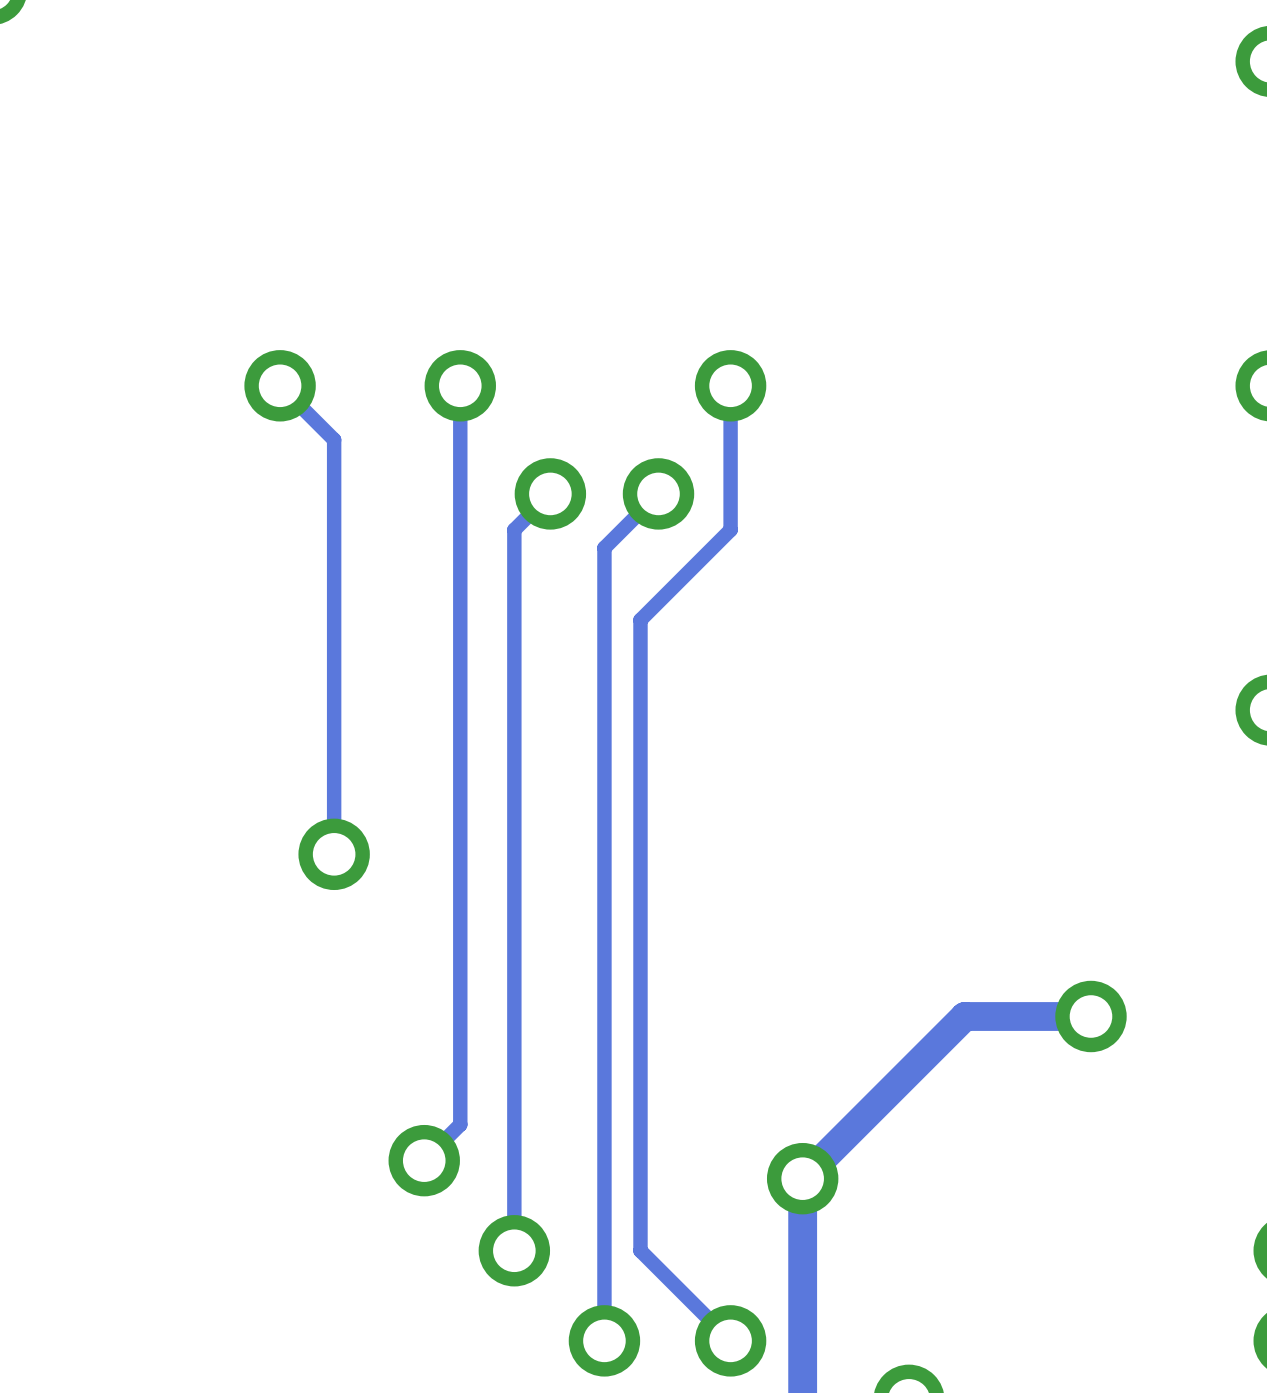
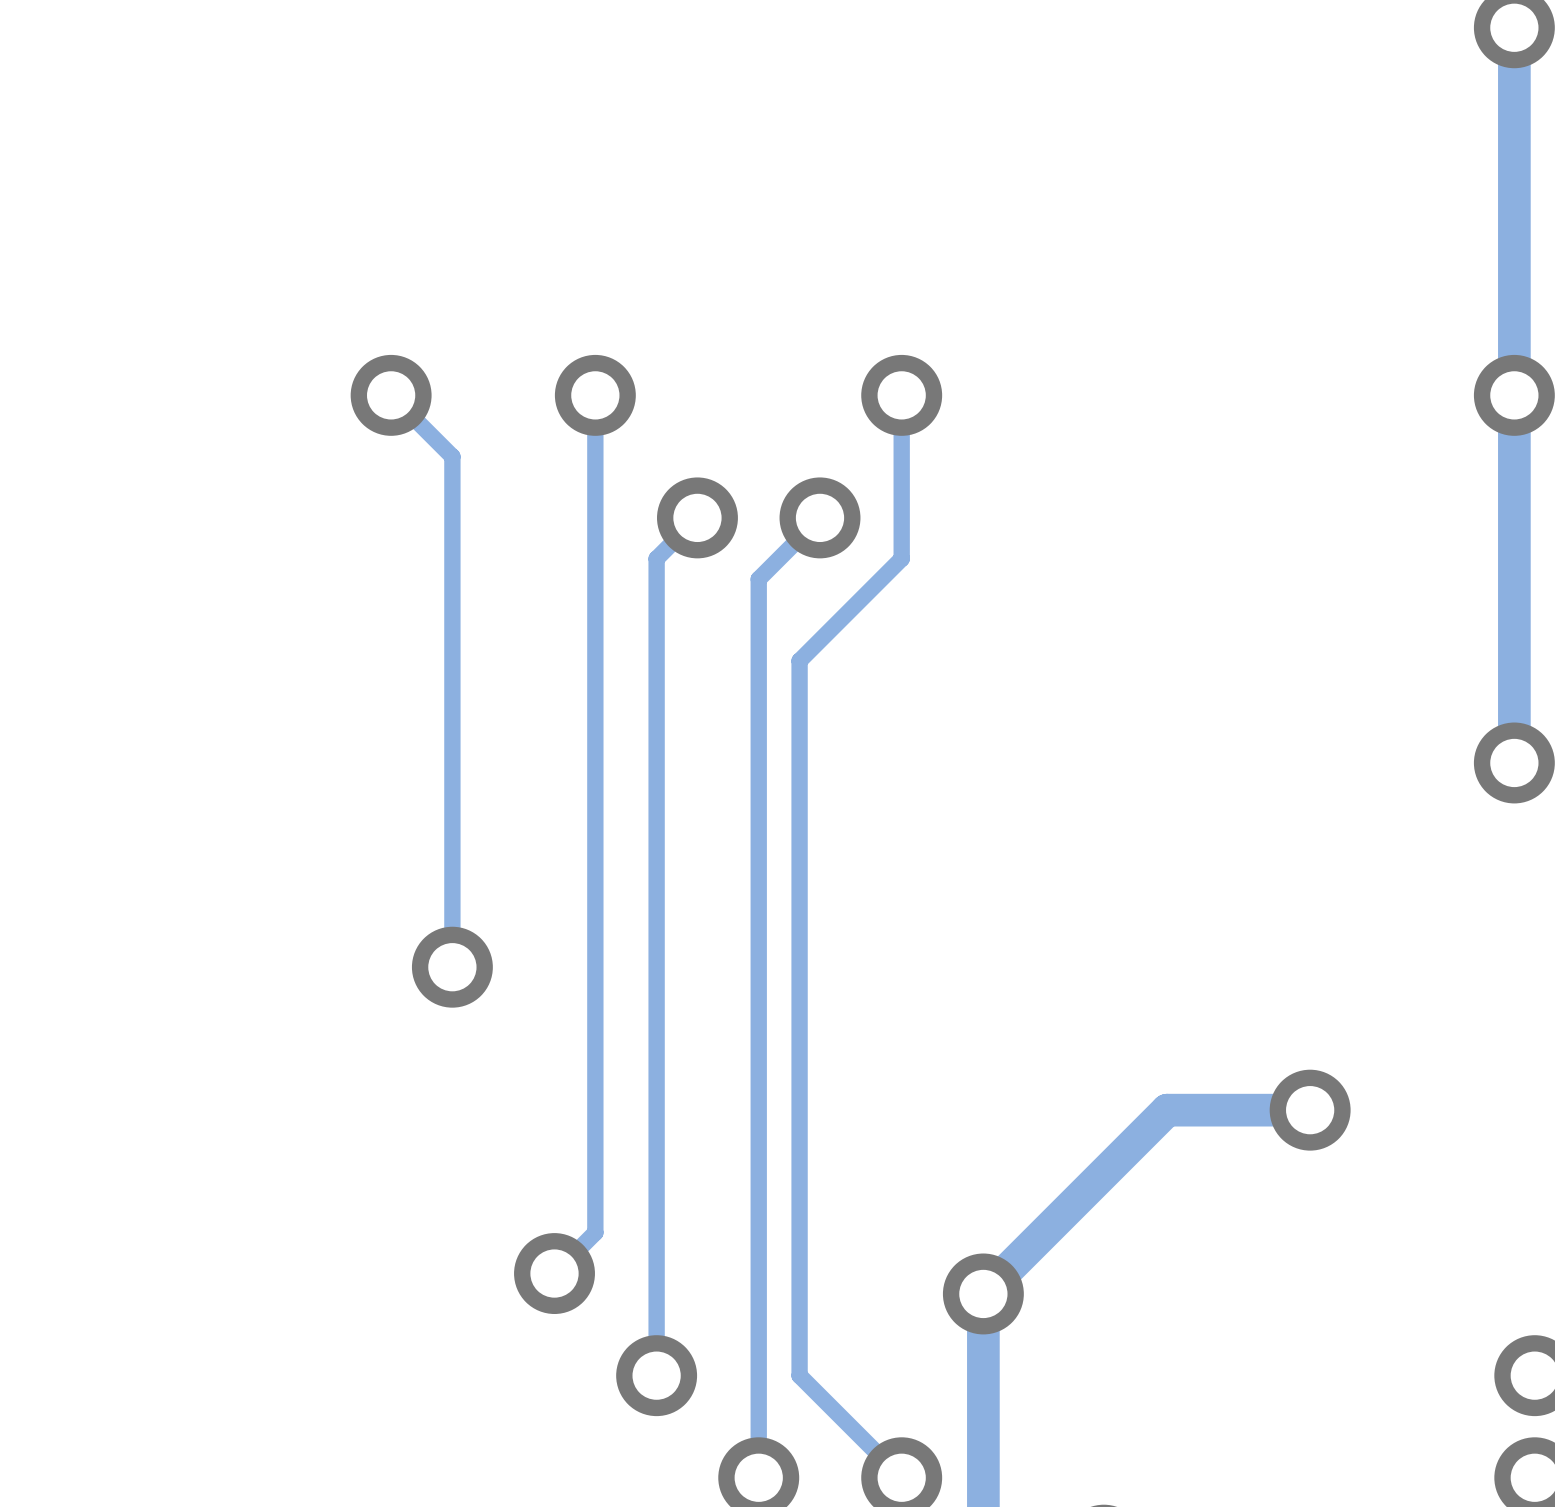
via position: (334, 854) -> (452, 967)

